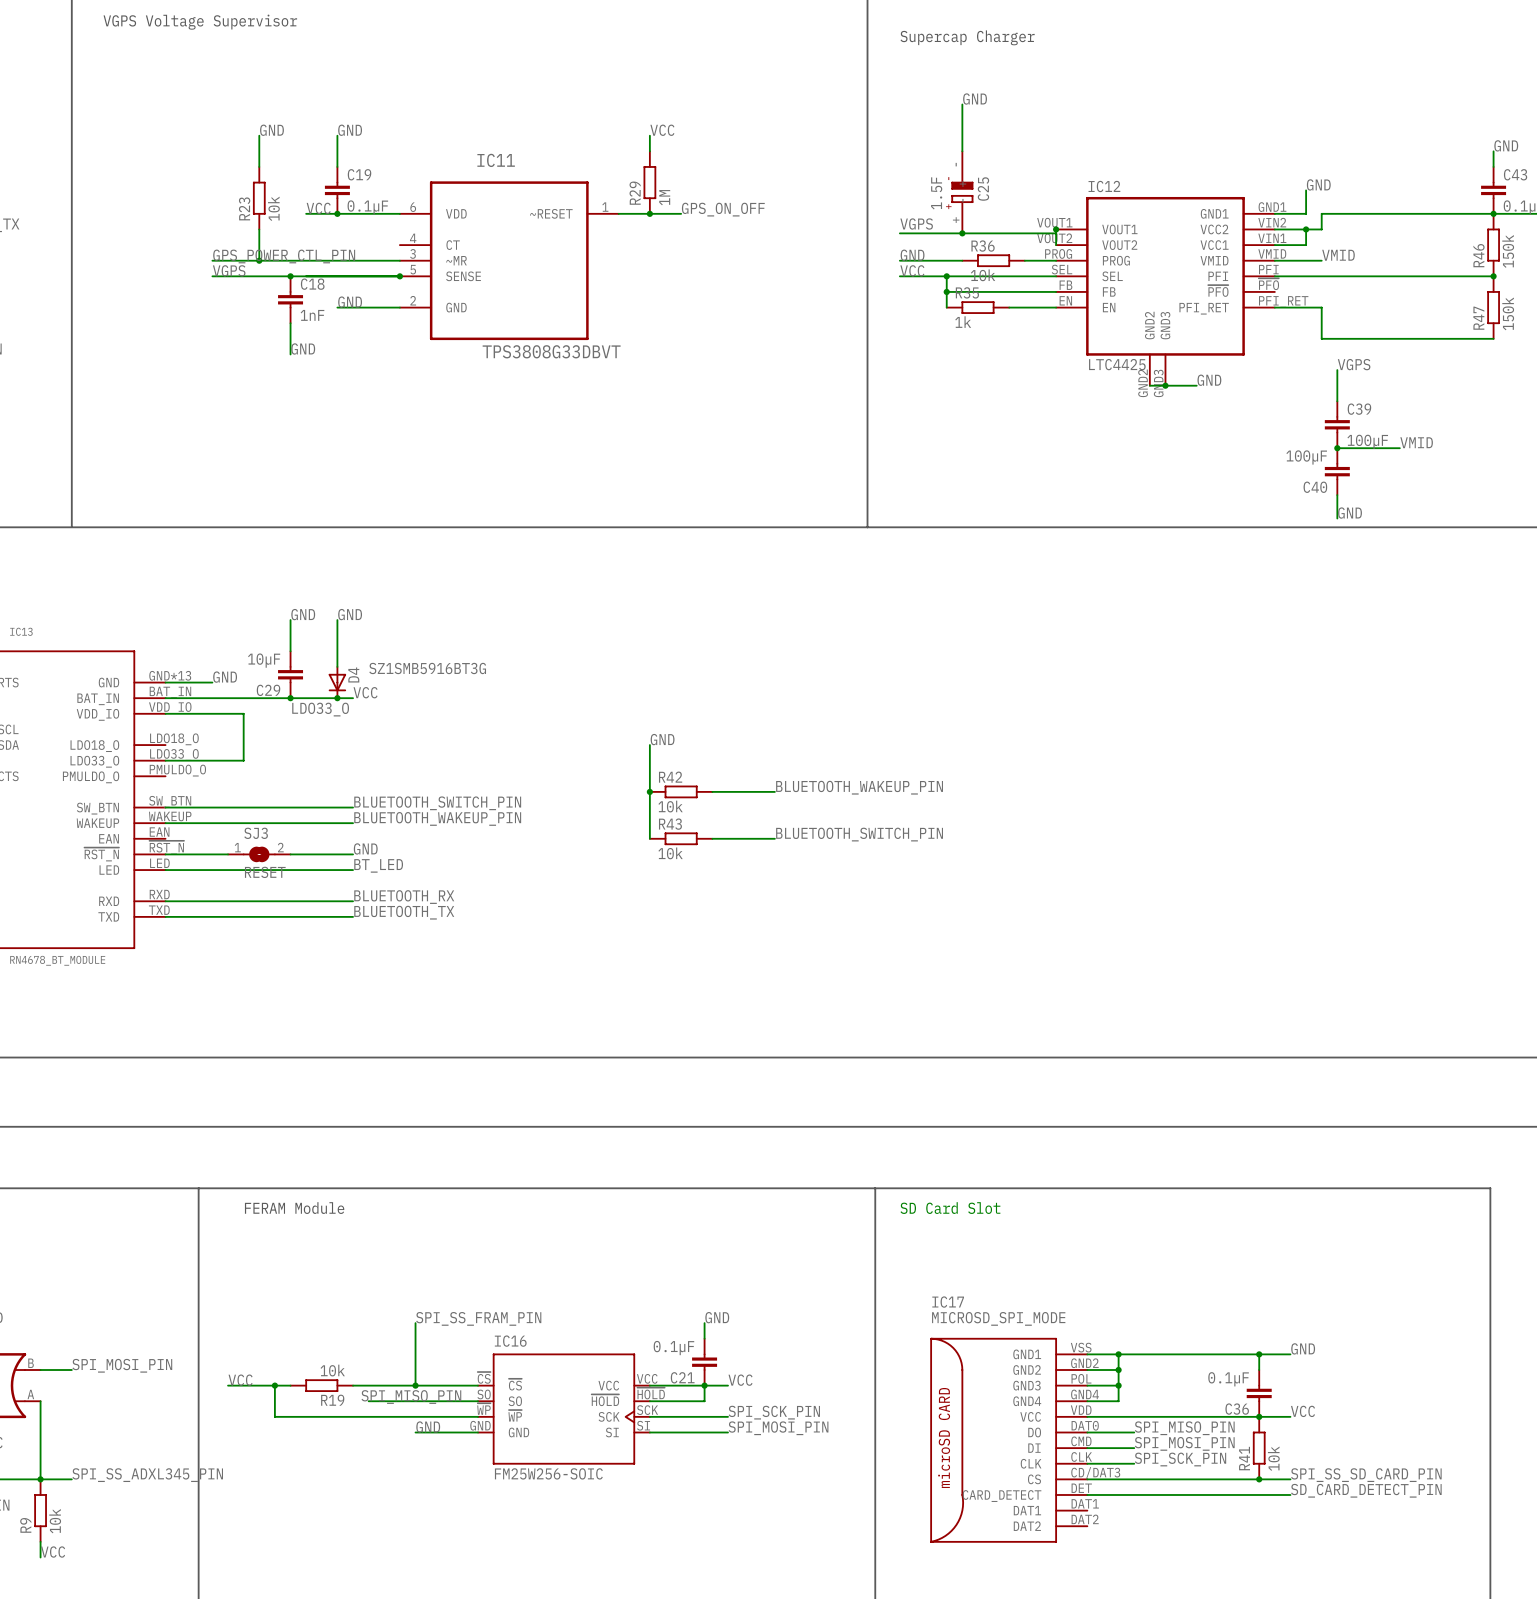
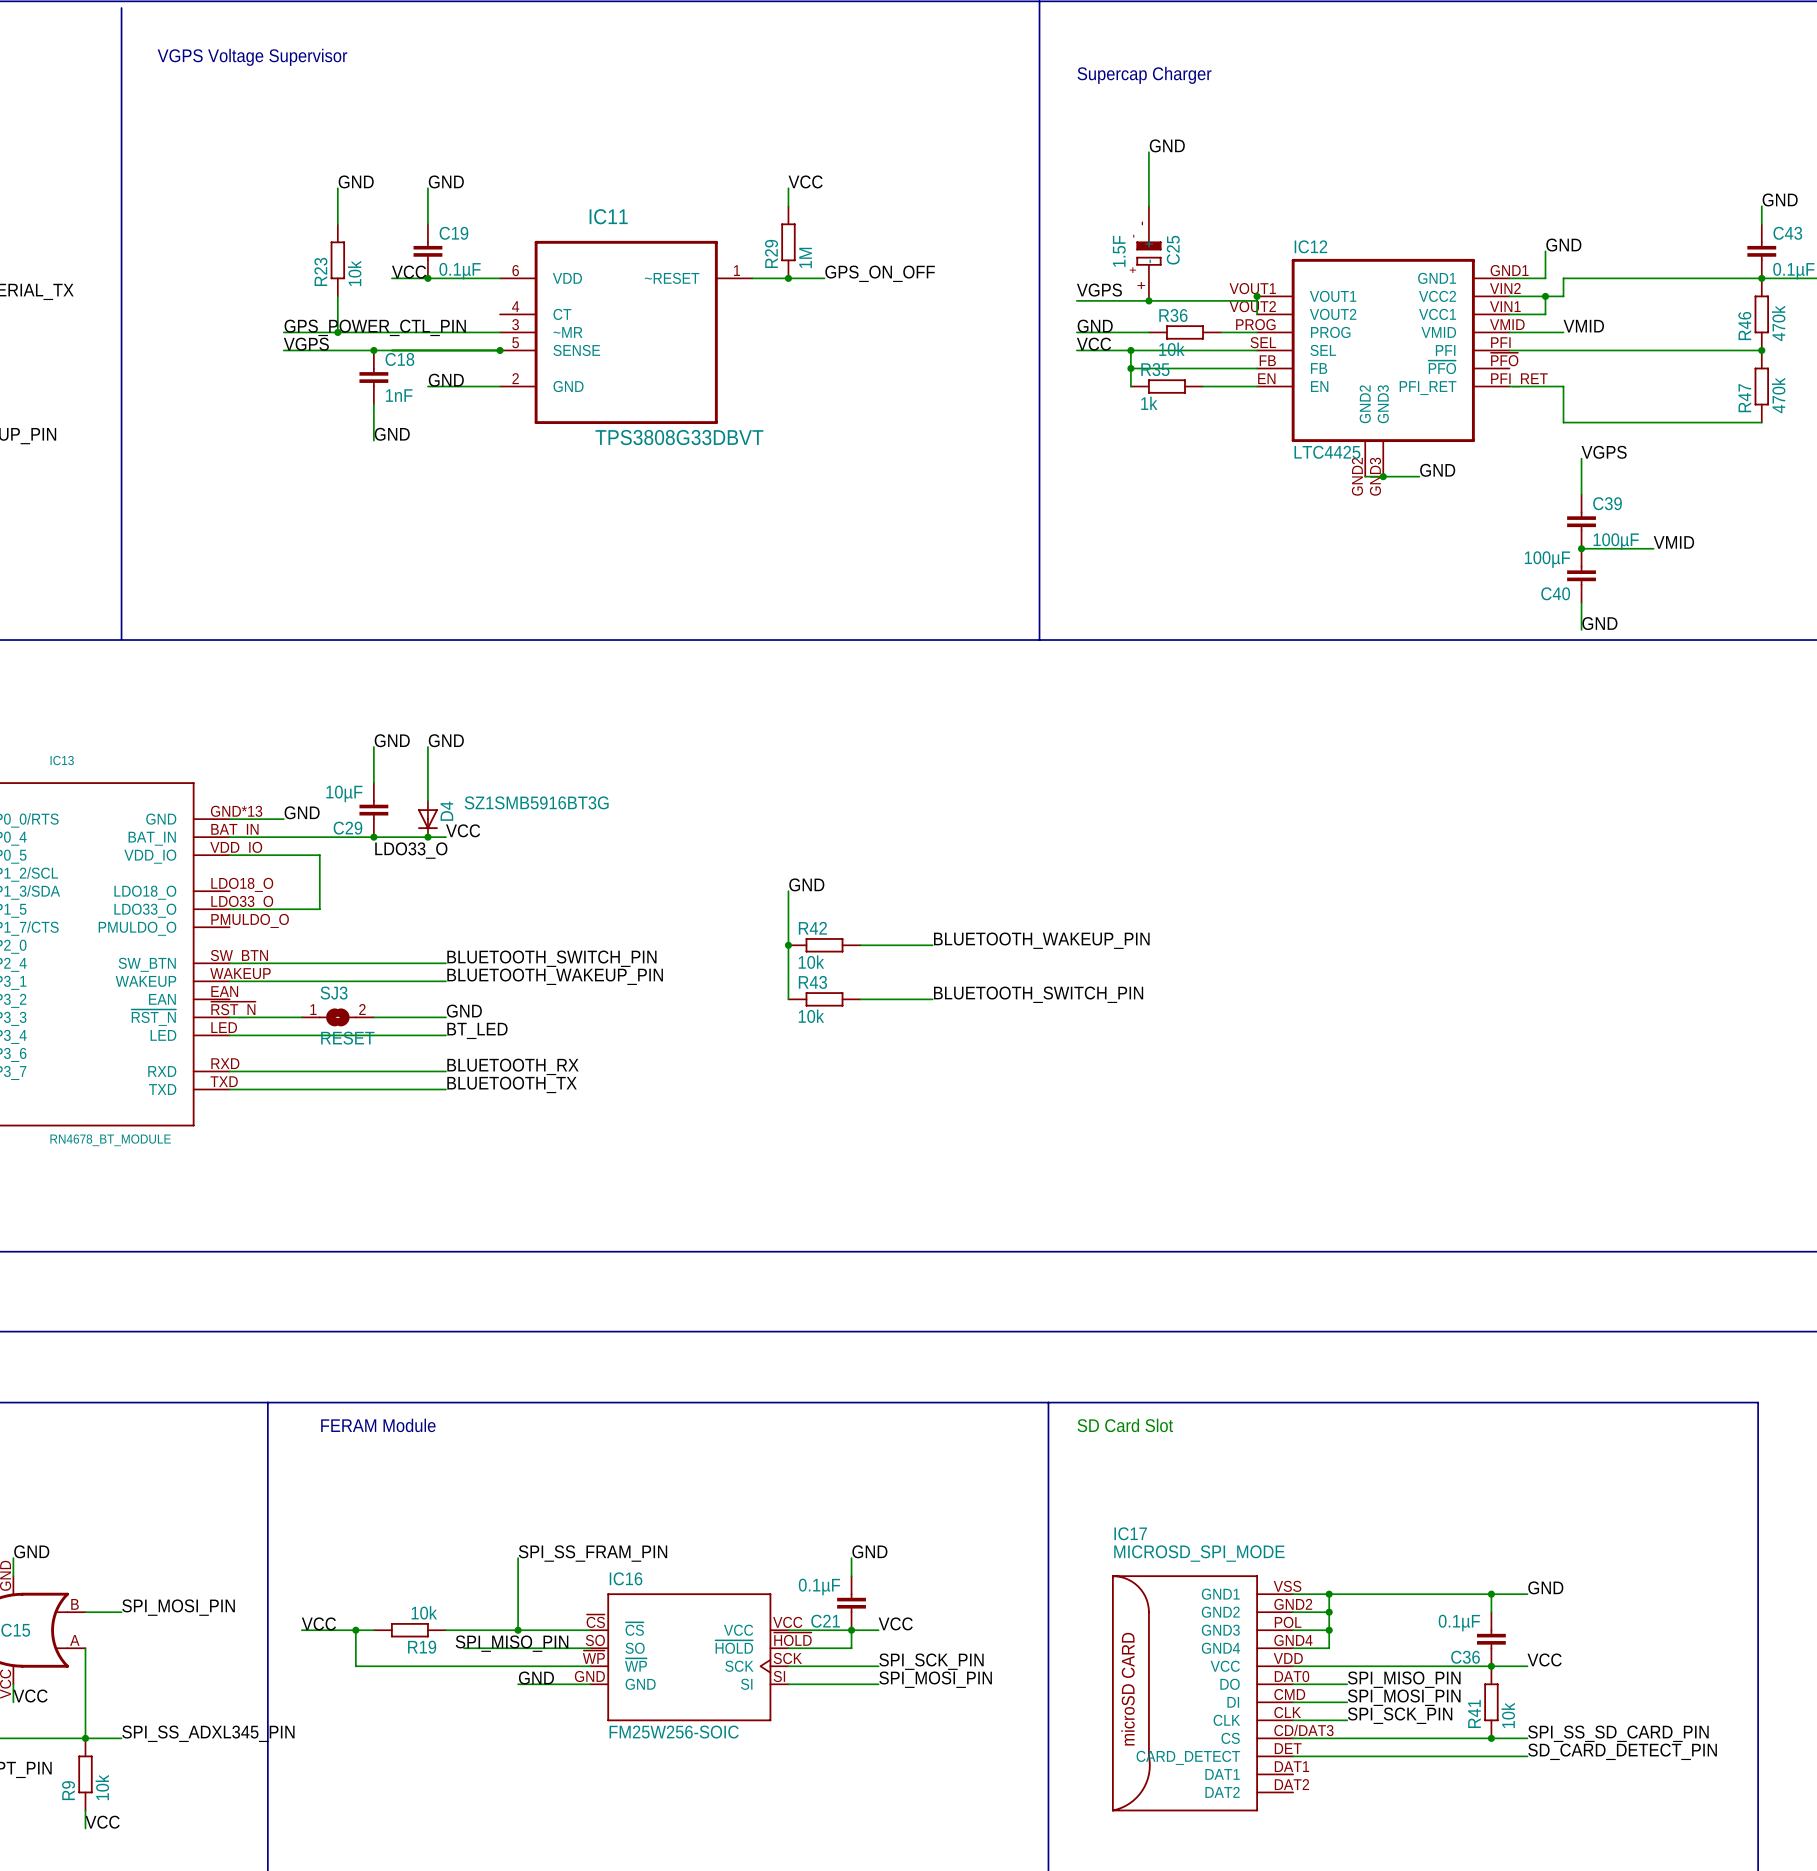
R46 value: 150k (1508, 251) -> 470k (1778, 323)
R47 value: 150k (1508, 313) -> 470k (1778, 395)

